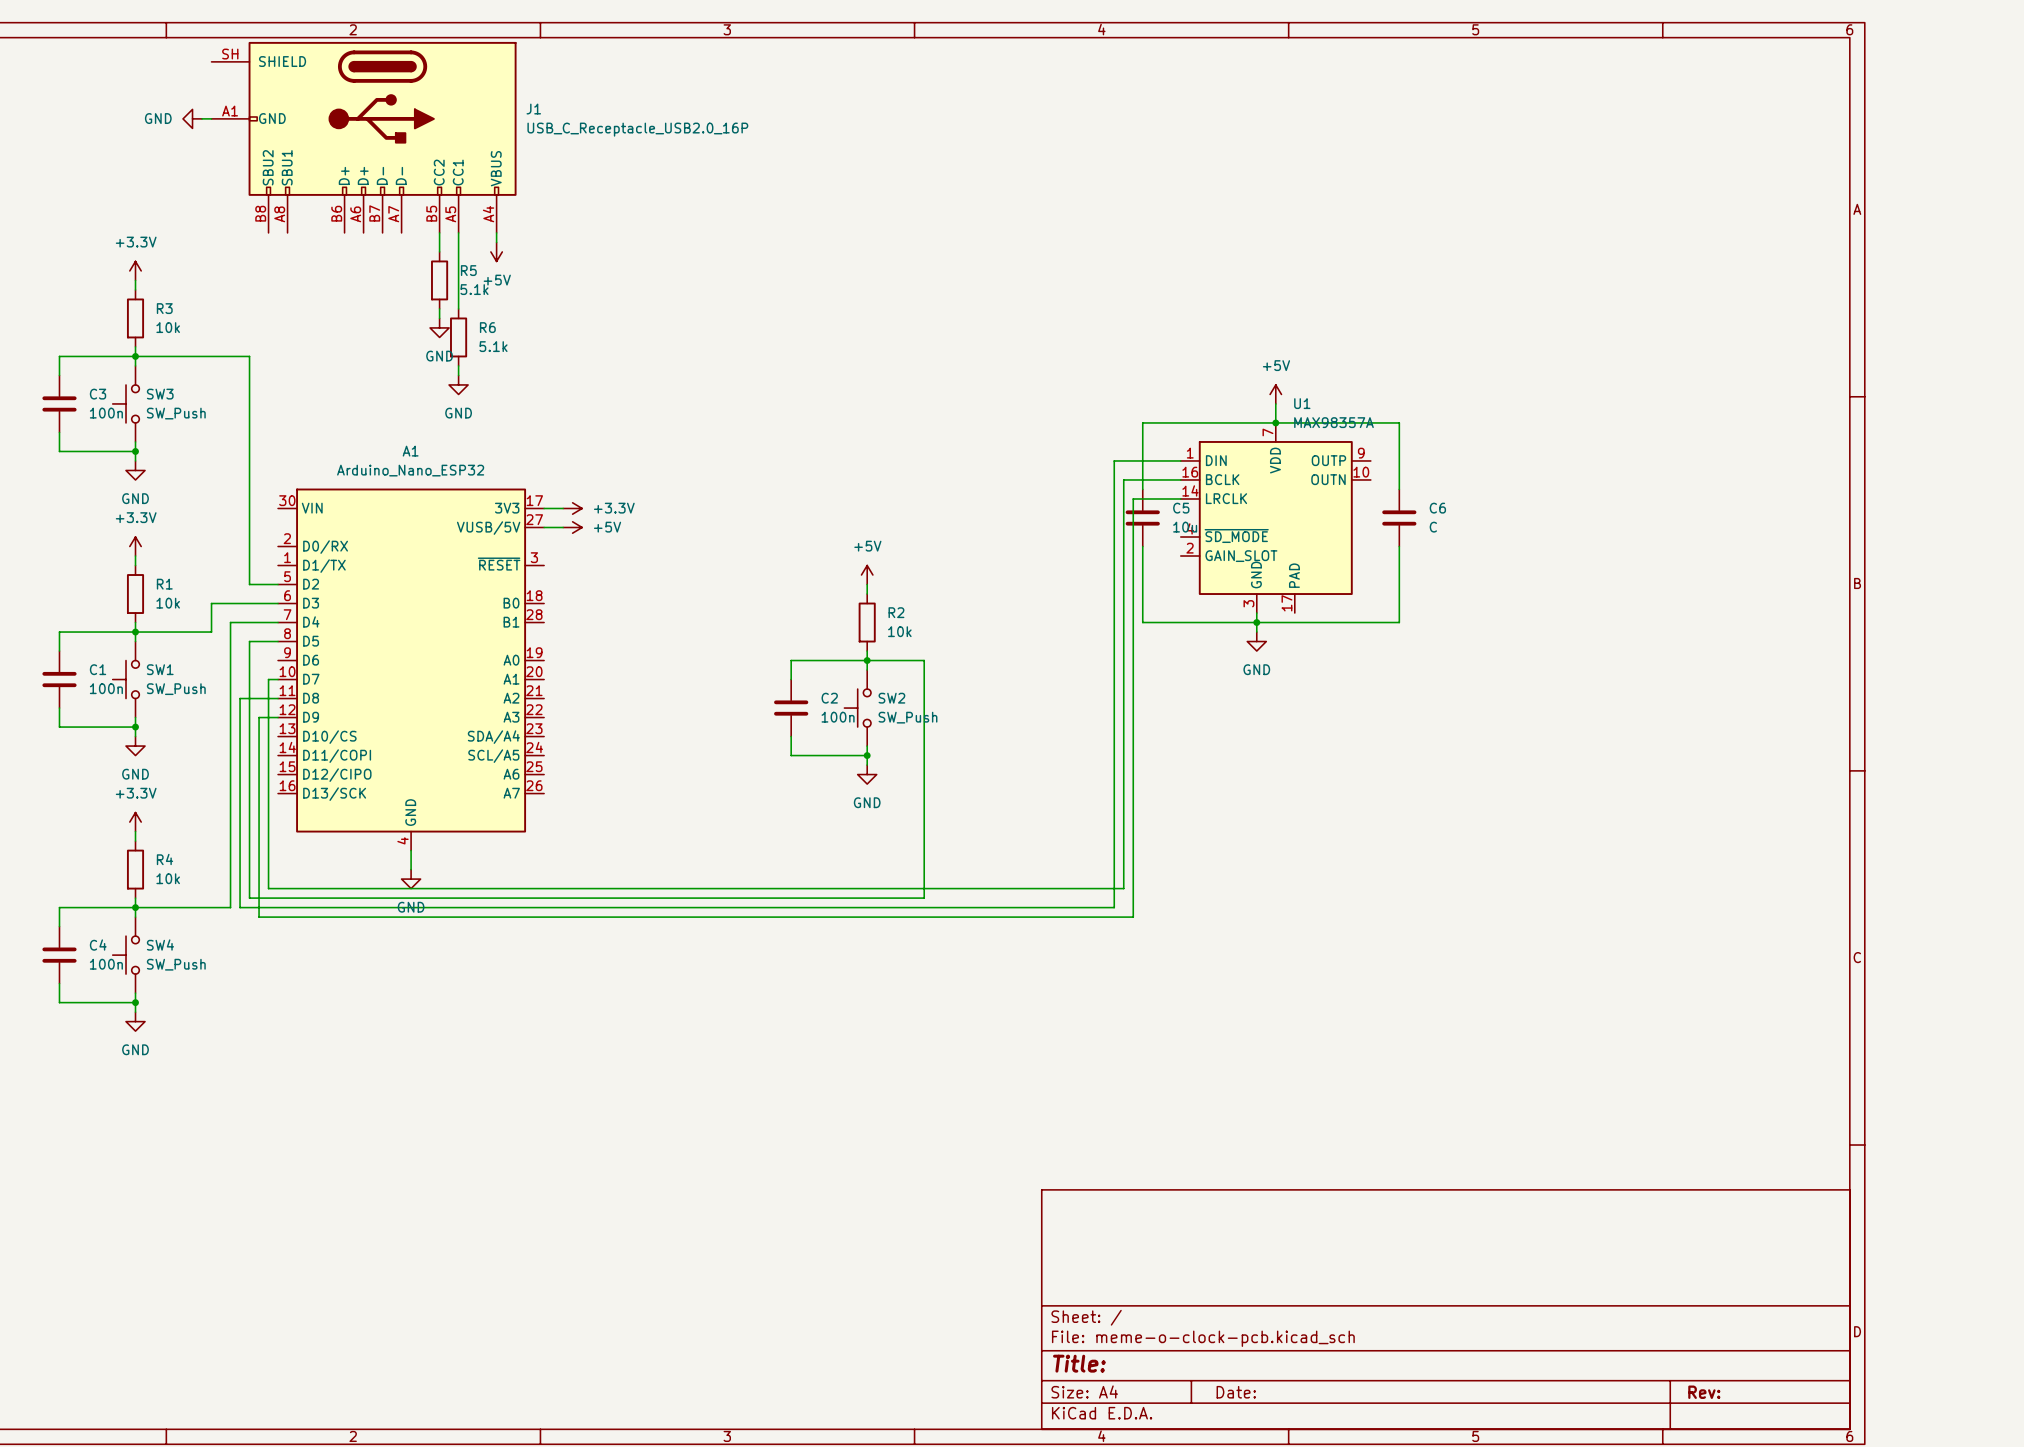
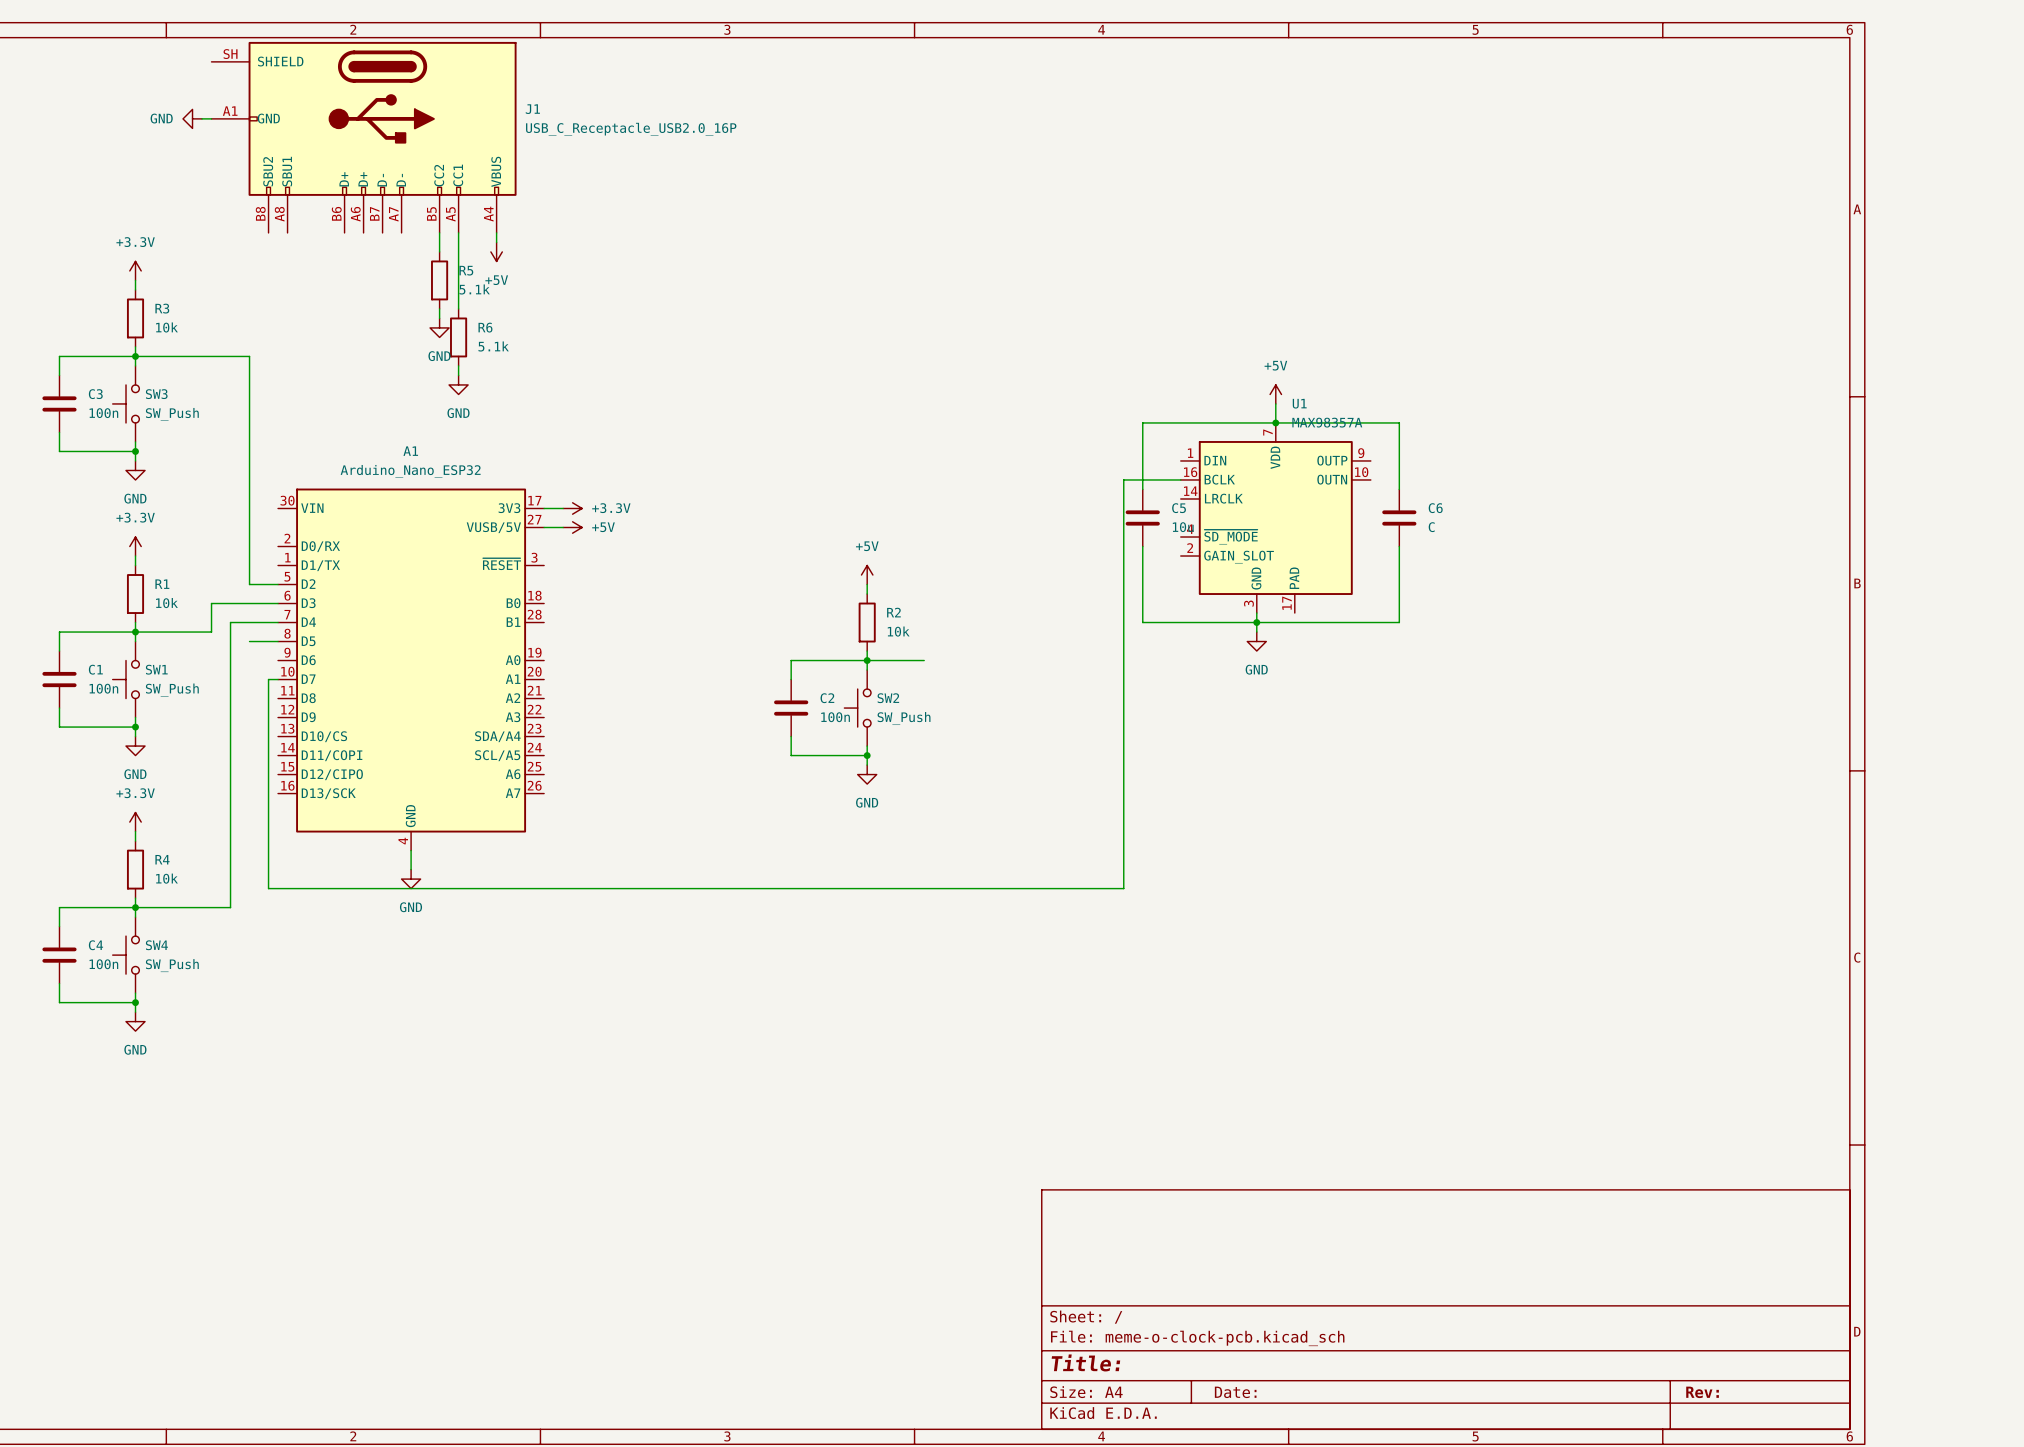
wire: (1180, 460) (1114, 460) (1114, 907) (240, 907) (240, 698) (278, 698) -> none
wire: (1180, 498) (1133, 498) (1133, 917) (259, 917) (259, 717) (278, 717) -> none
wire: (249, 641) (249, 898) (924, 898) (924, 660) -> none

